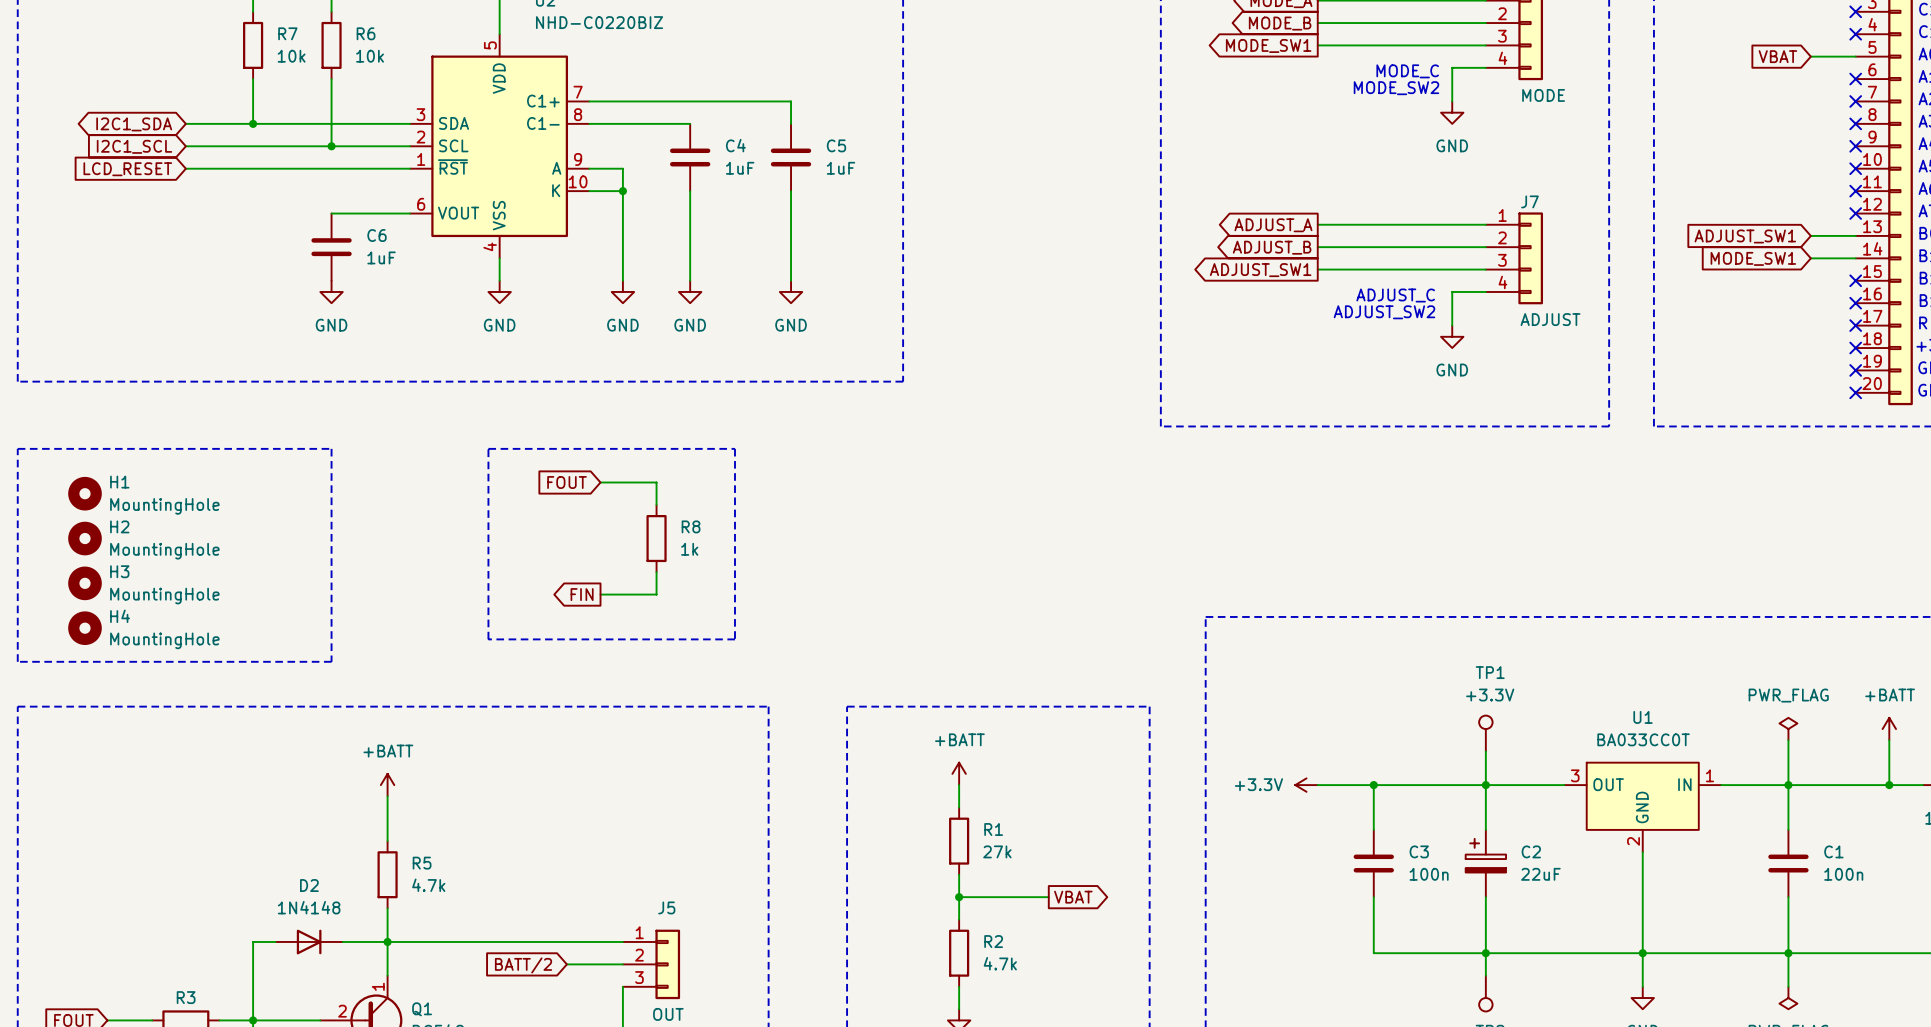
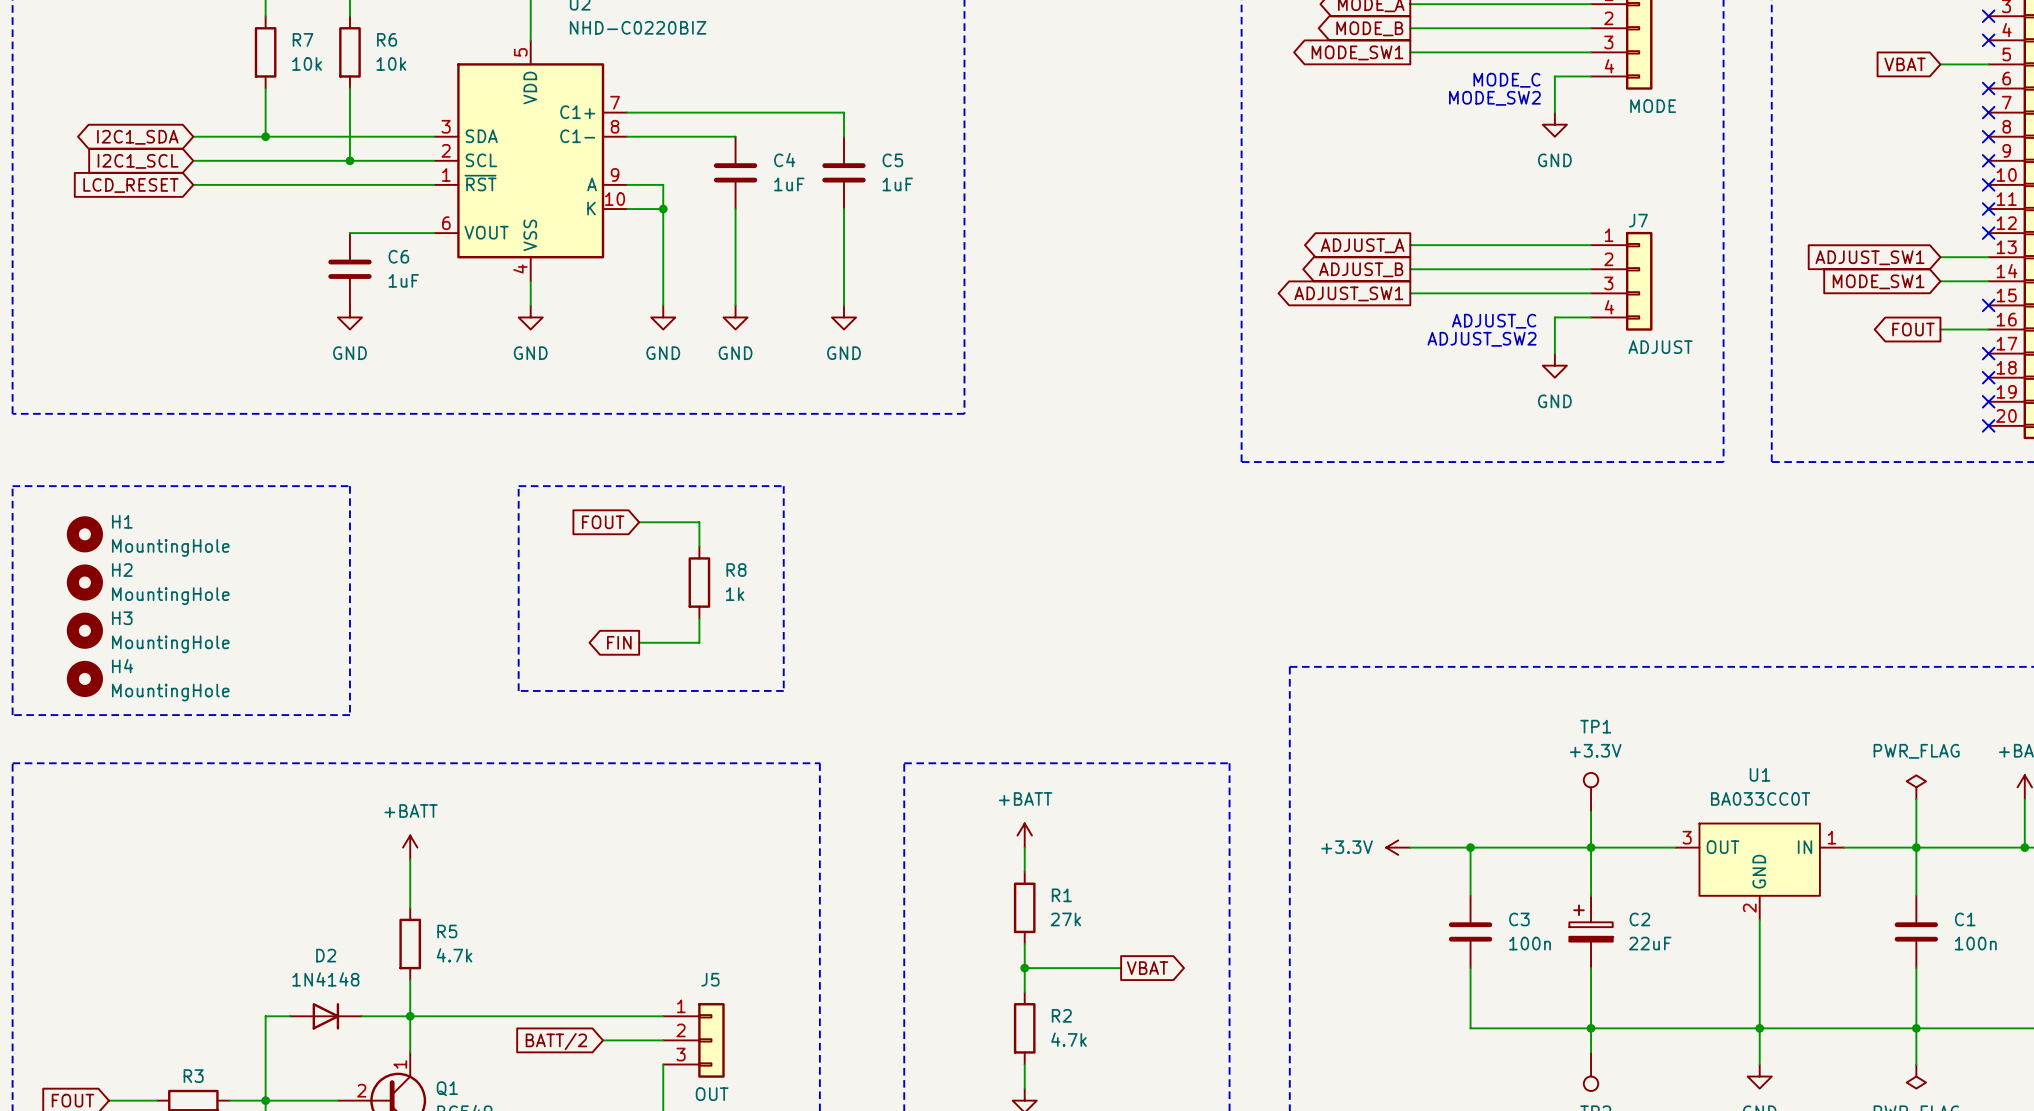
global label: none -> FOUT (1913, 329)
wire: none -> (1940, 329) (1988, 329)
no-connect mark: (1855, 303) -> none

